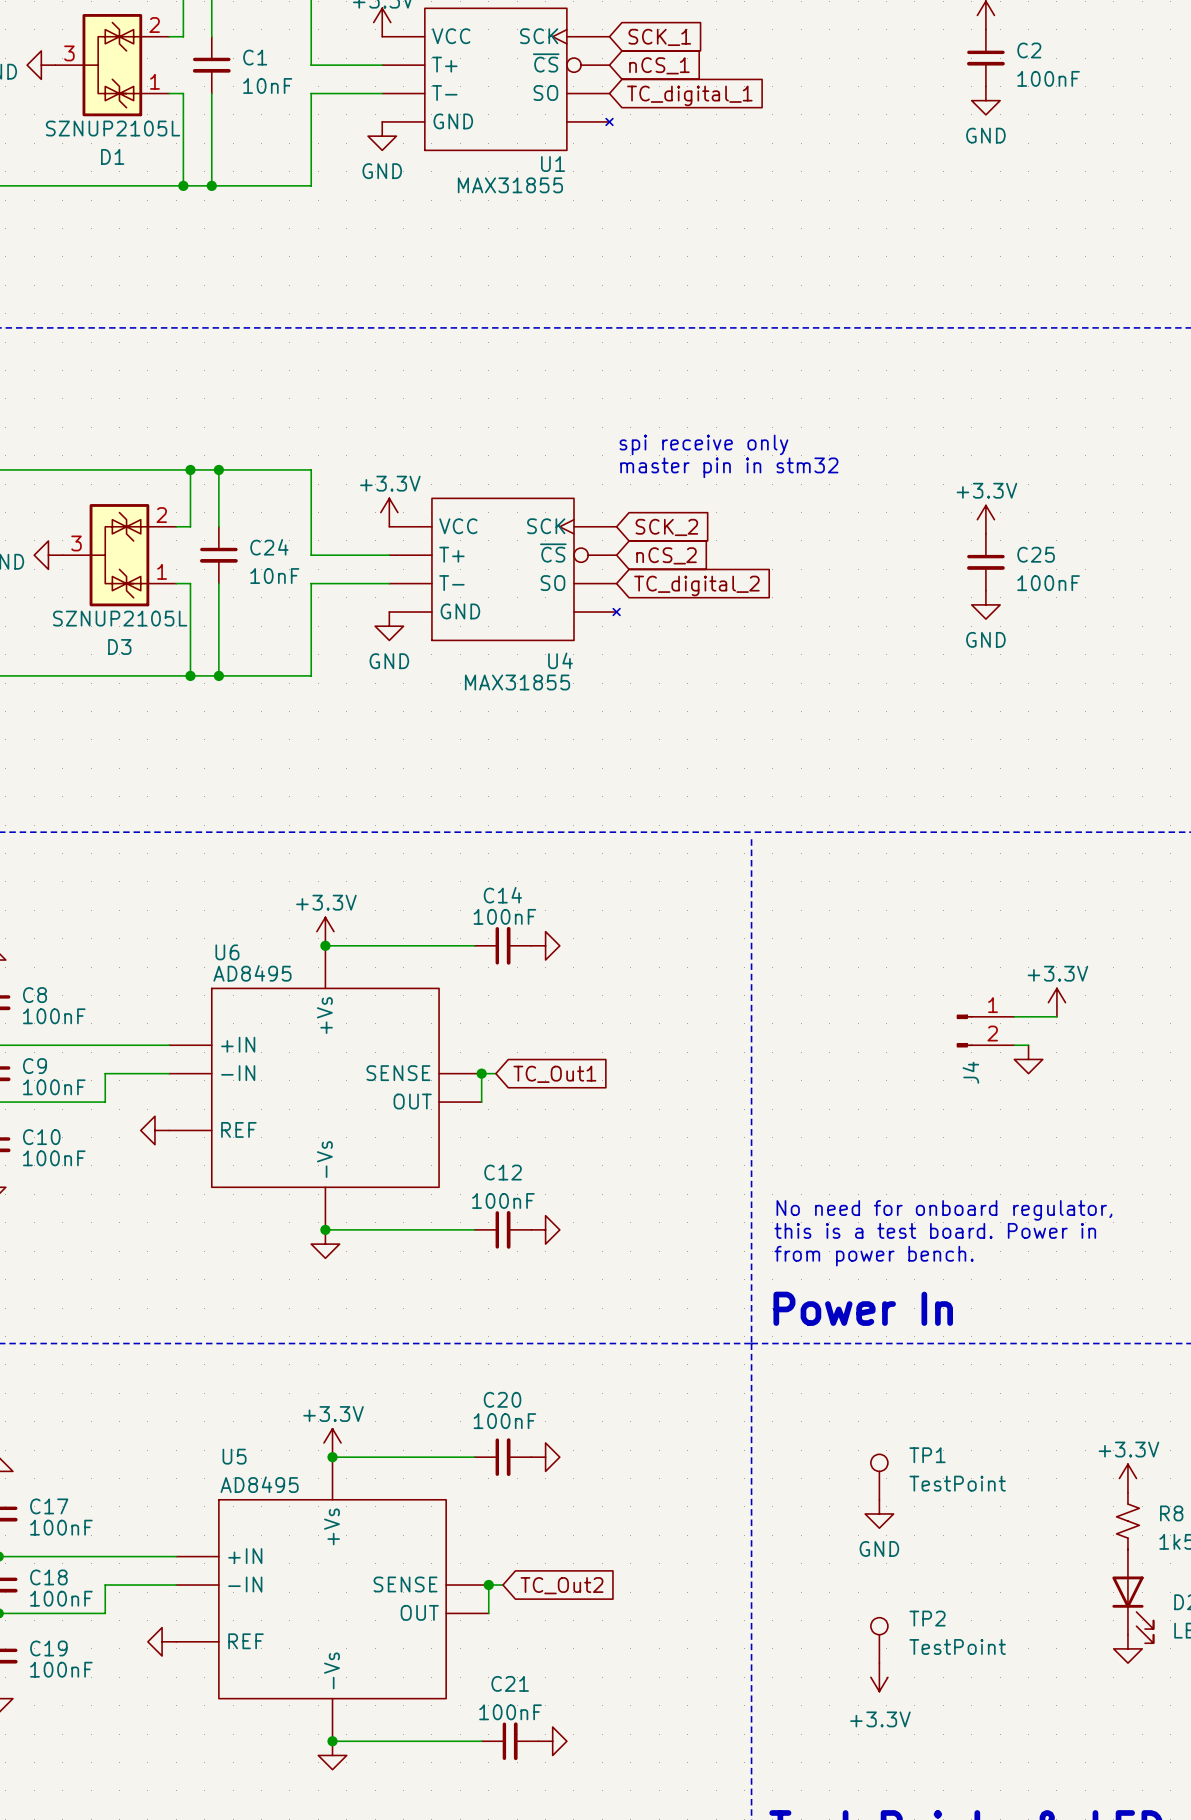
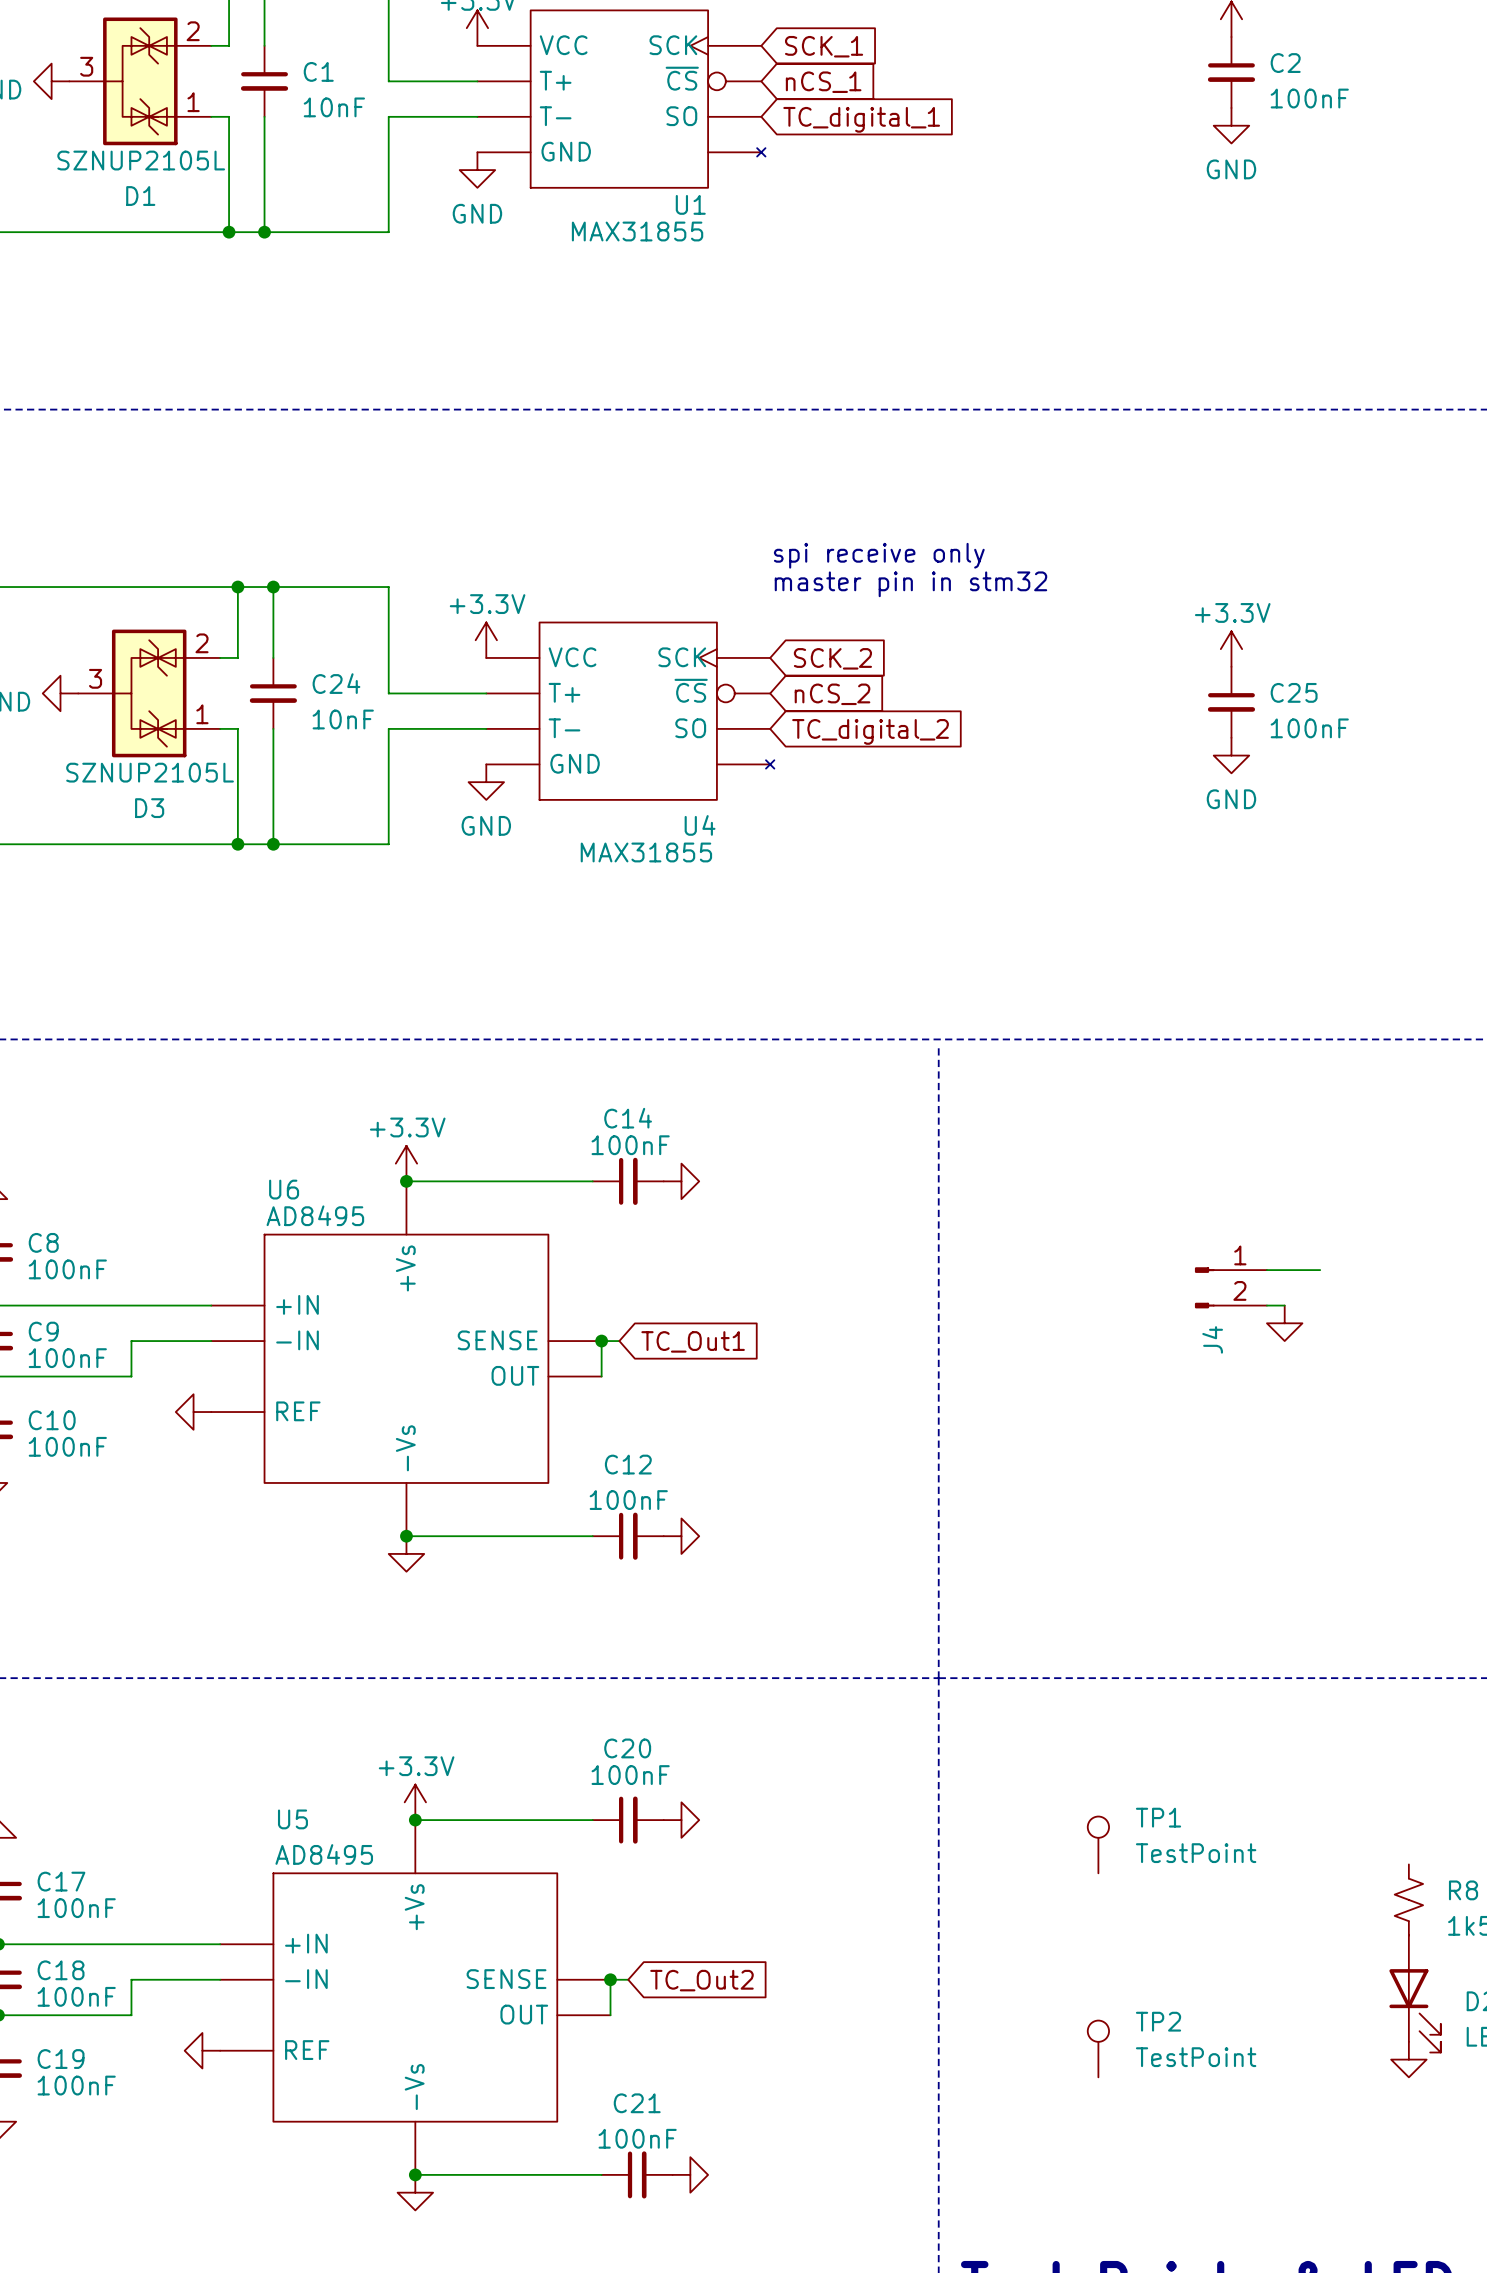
power symbol: +3.3V (1056, 1002) -> none
text: No need for onboard regulator, (944, 1210) -> none
text: this is a test board. Power in (935, 1230) -> none
text: from power bench. (874, 1256) -> none
text: Power In (863, 1308) -> none
power symbol: +3.3V (1127, 1478) -> none
power symbol: GND (879, 1513) -> none
power symbol: +3.3V (879, 1677) -> none

